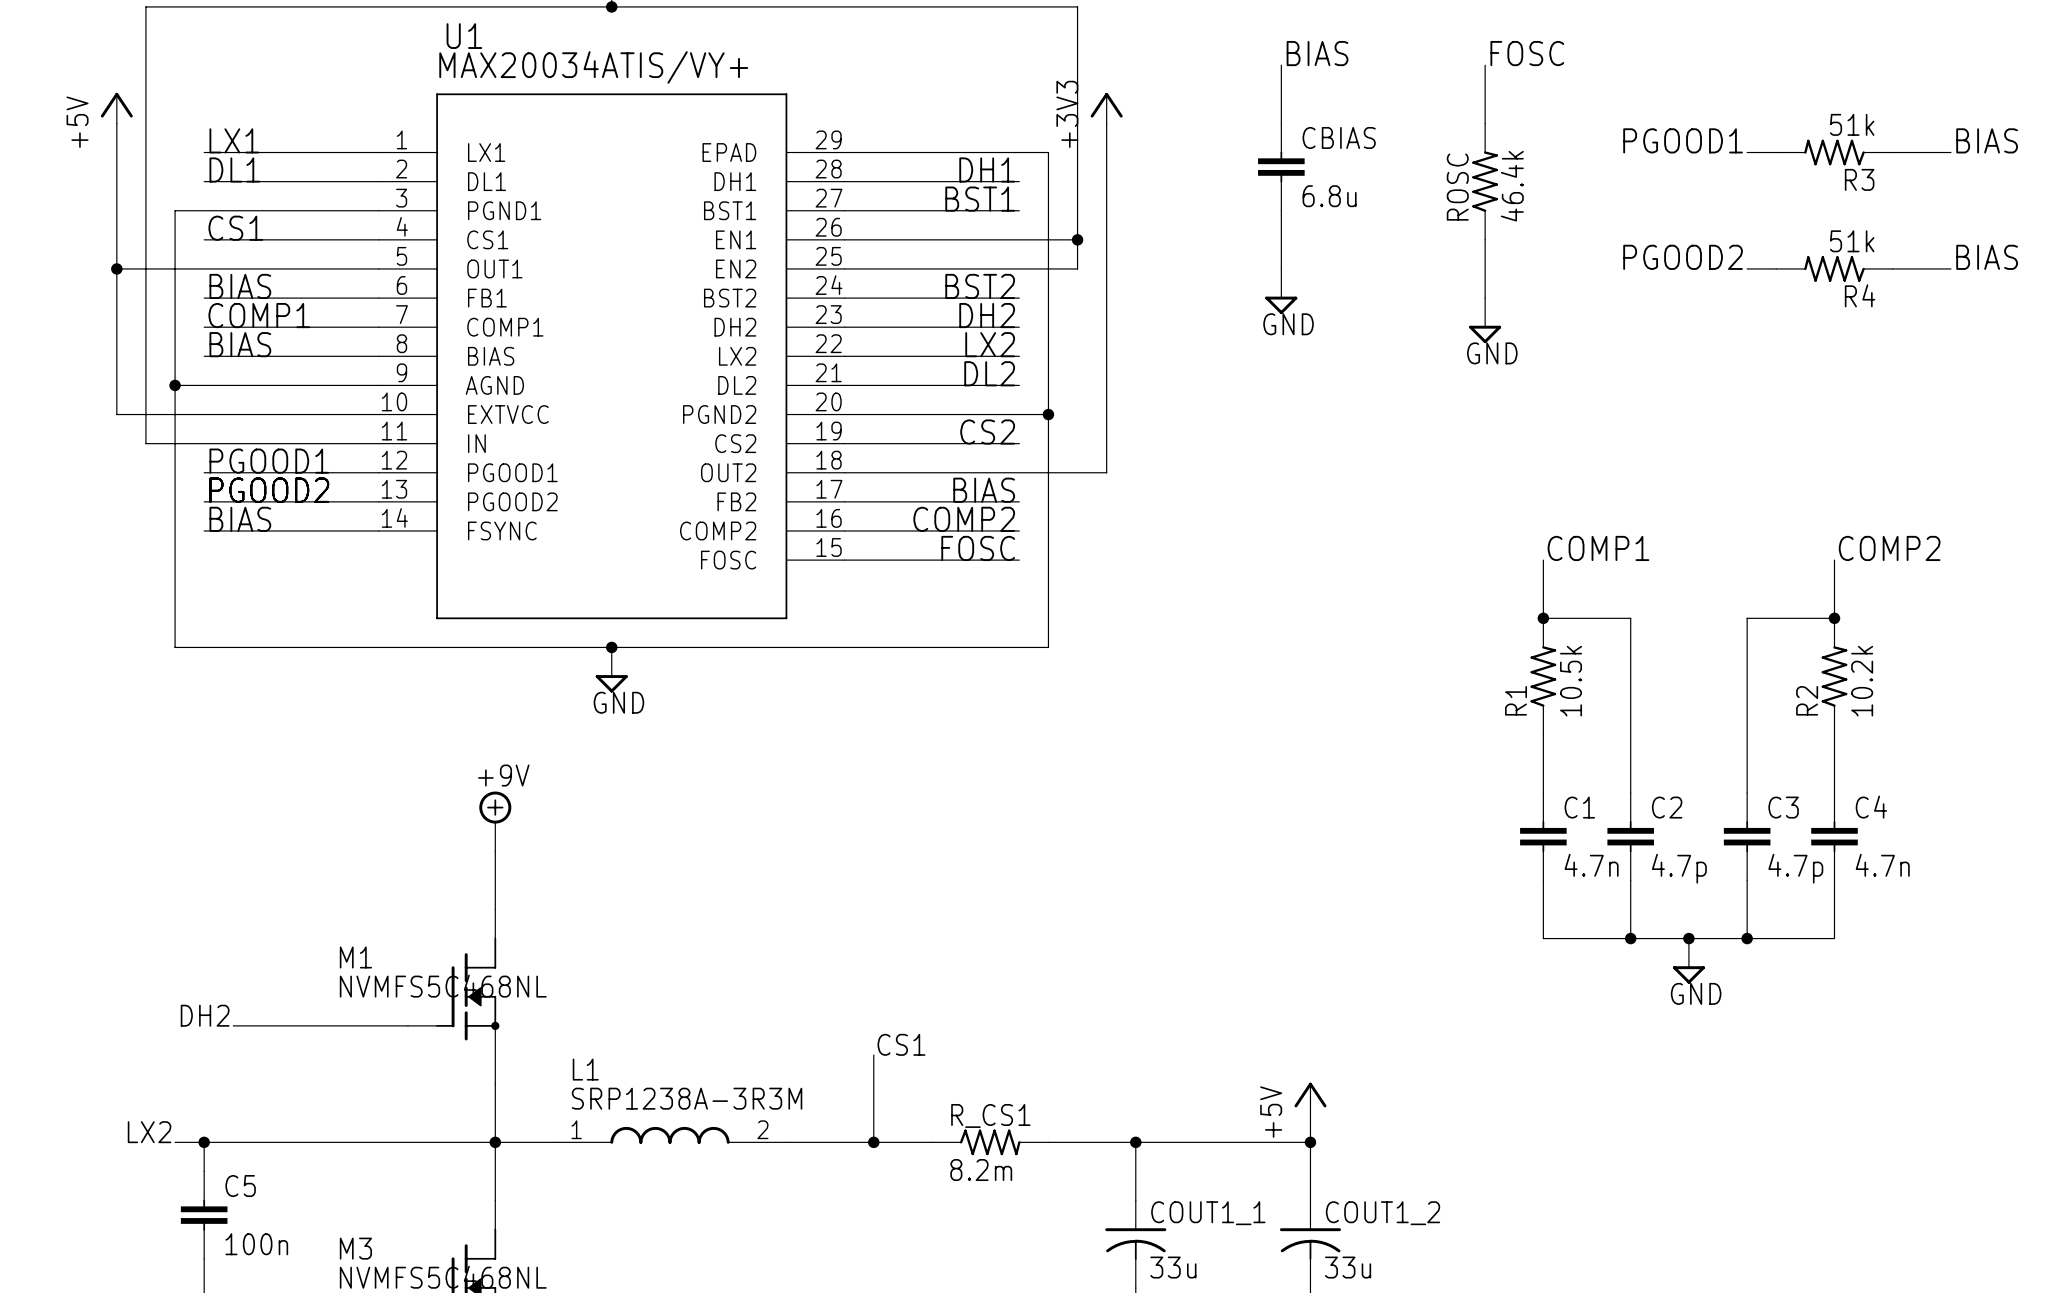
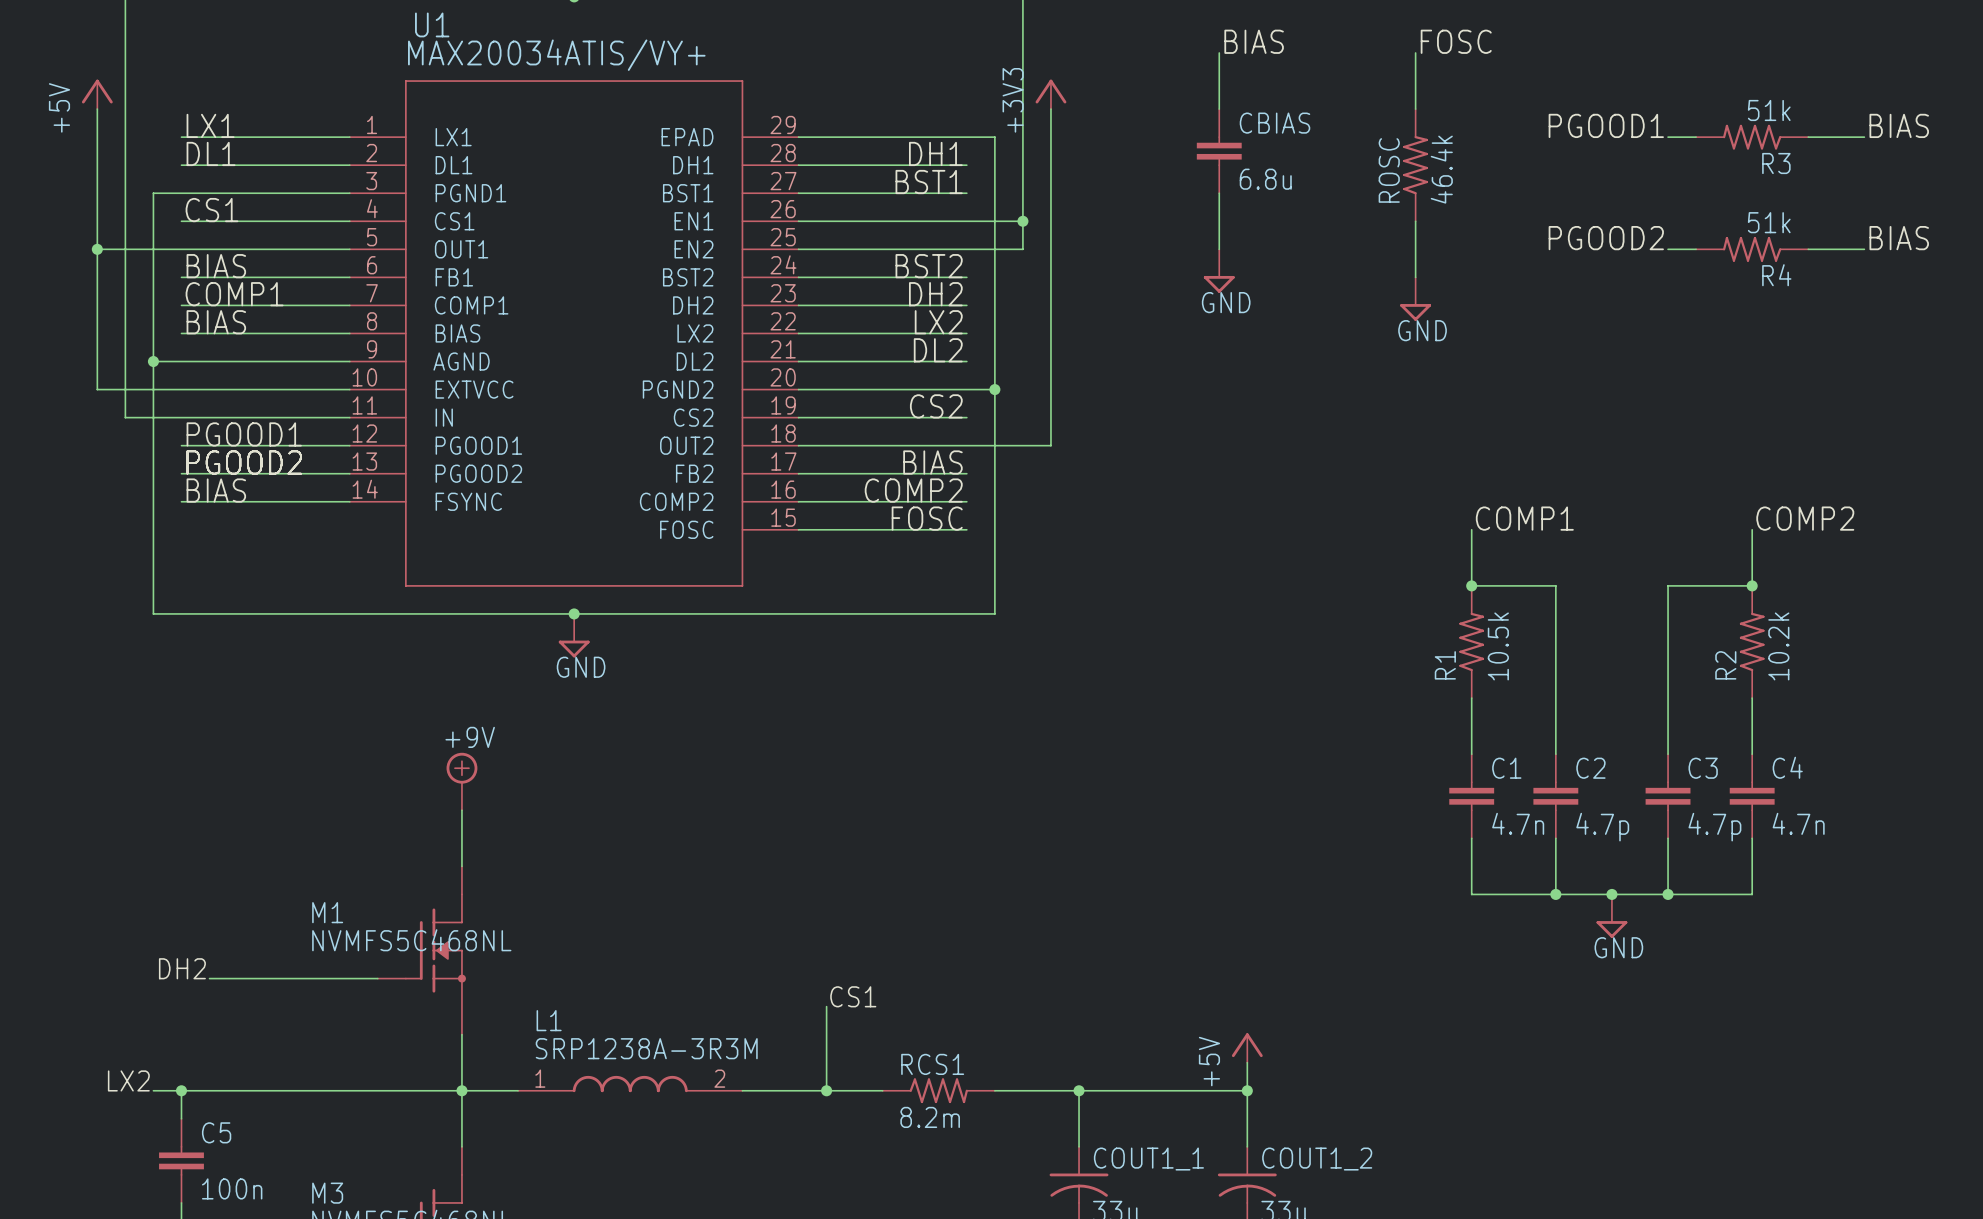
R_CS1 name: R_CS1 (990, 1115) -> RCS1 (932, 1064)

